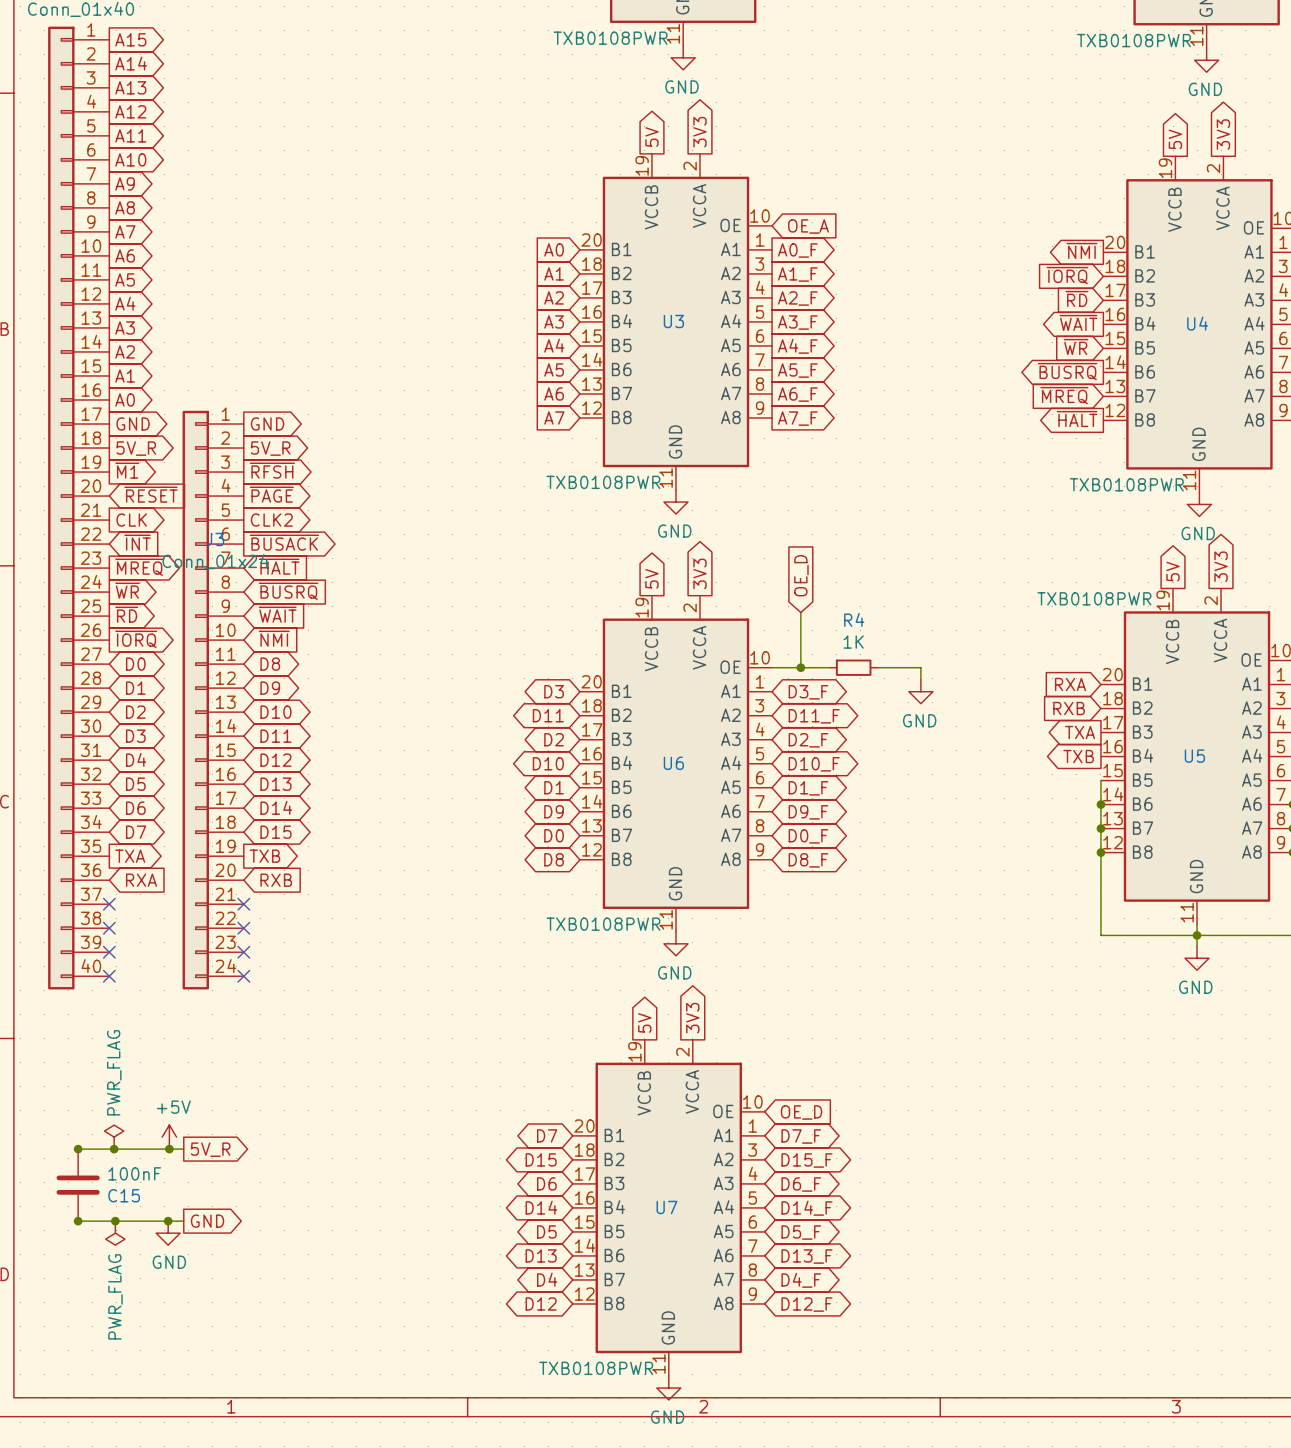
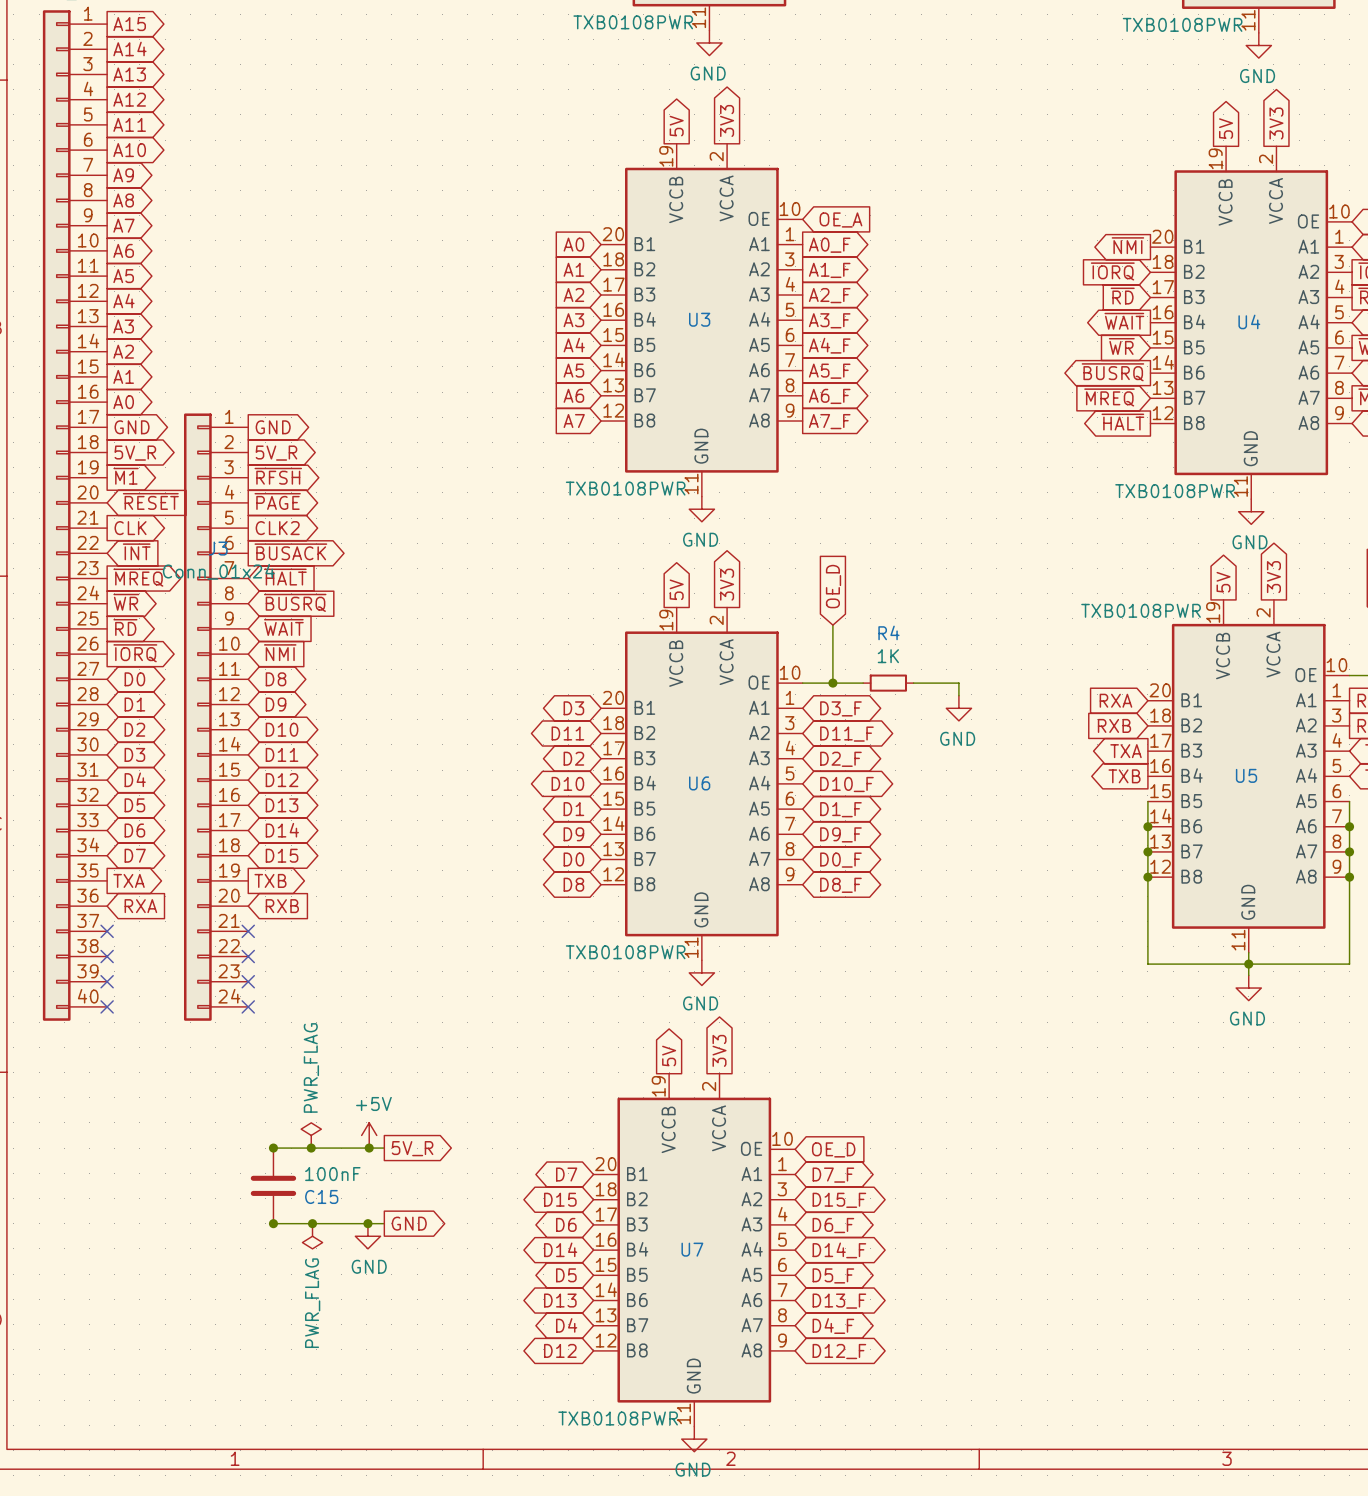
power symbol: none -> PWR_FLAG (311, 1135)
junction: none -> (273, 1148)
junction: none -> (311, 1148)
junction: none -> (369, 1148)
power symbol: PWR_FLAG (114, 1137) -> none
power symbol position: +5V (169, 1137) -> +5V (369, 1135)
wire: (75, 1149) (183, 1149) -> (270, 1148) (384, 1148)
junction: (78, 1149) -> none
junction: (114, 1149) -> none
junction: (169, 1149) -> none
global label position: 5V_R (210, 1149) -> 5V_R (412, 1148)
junction: none -> (273, 1223)
junction: none -> (312, 1223)
junction: none -> (367, 1223)
C15 position: (78, 1185) -> (273, 1185)
power symbol: none -> PWR_FLAG (312, 1236)
wire: (75, 1221) (183, 1221) -> (270, 1223) (384, 1223)
junction: (78, 1221) -> none
junction: (115, 1221) -> none
junction: (168, 1221) -> none
global label position: GND (207, 1221) -> GND (409, 1223)
power symbol: PWR_FLAG (115, 1233) -> none
power symbol position: GND (168, 1233) -> GND (367, 1236)

